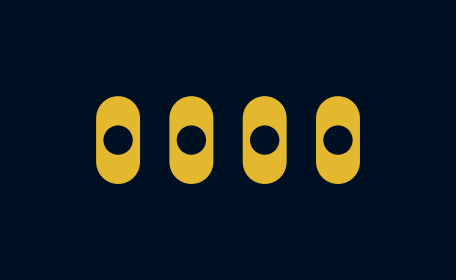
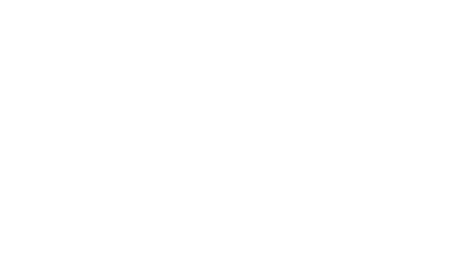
part: (228, 140) -> none

